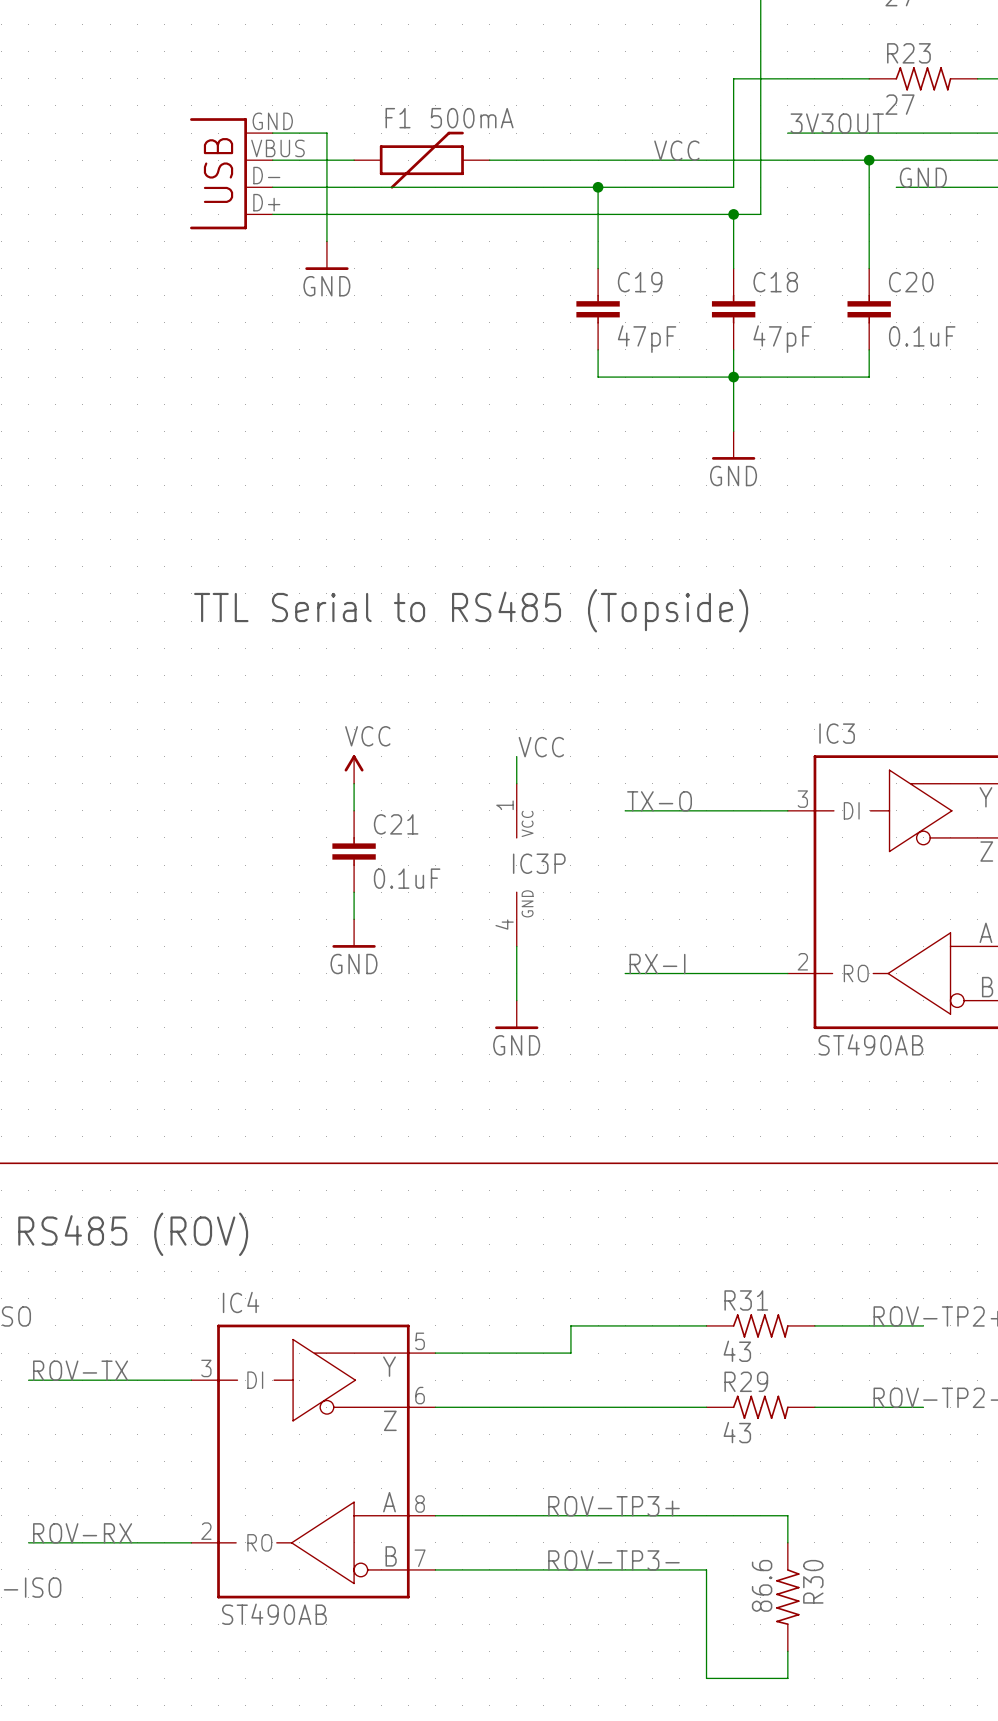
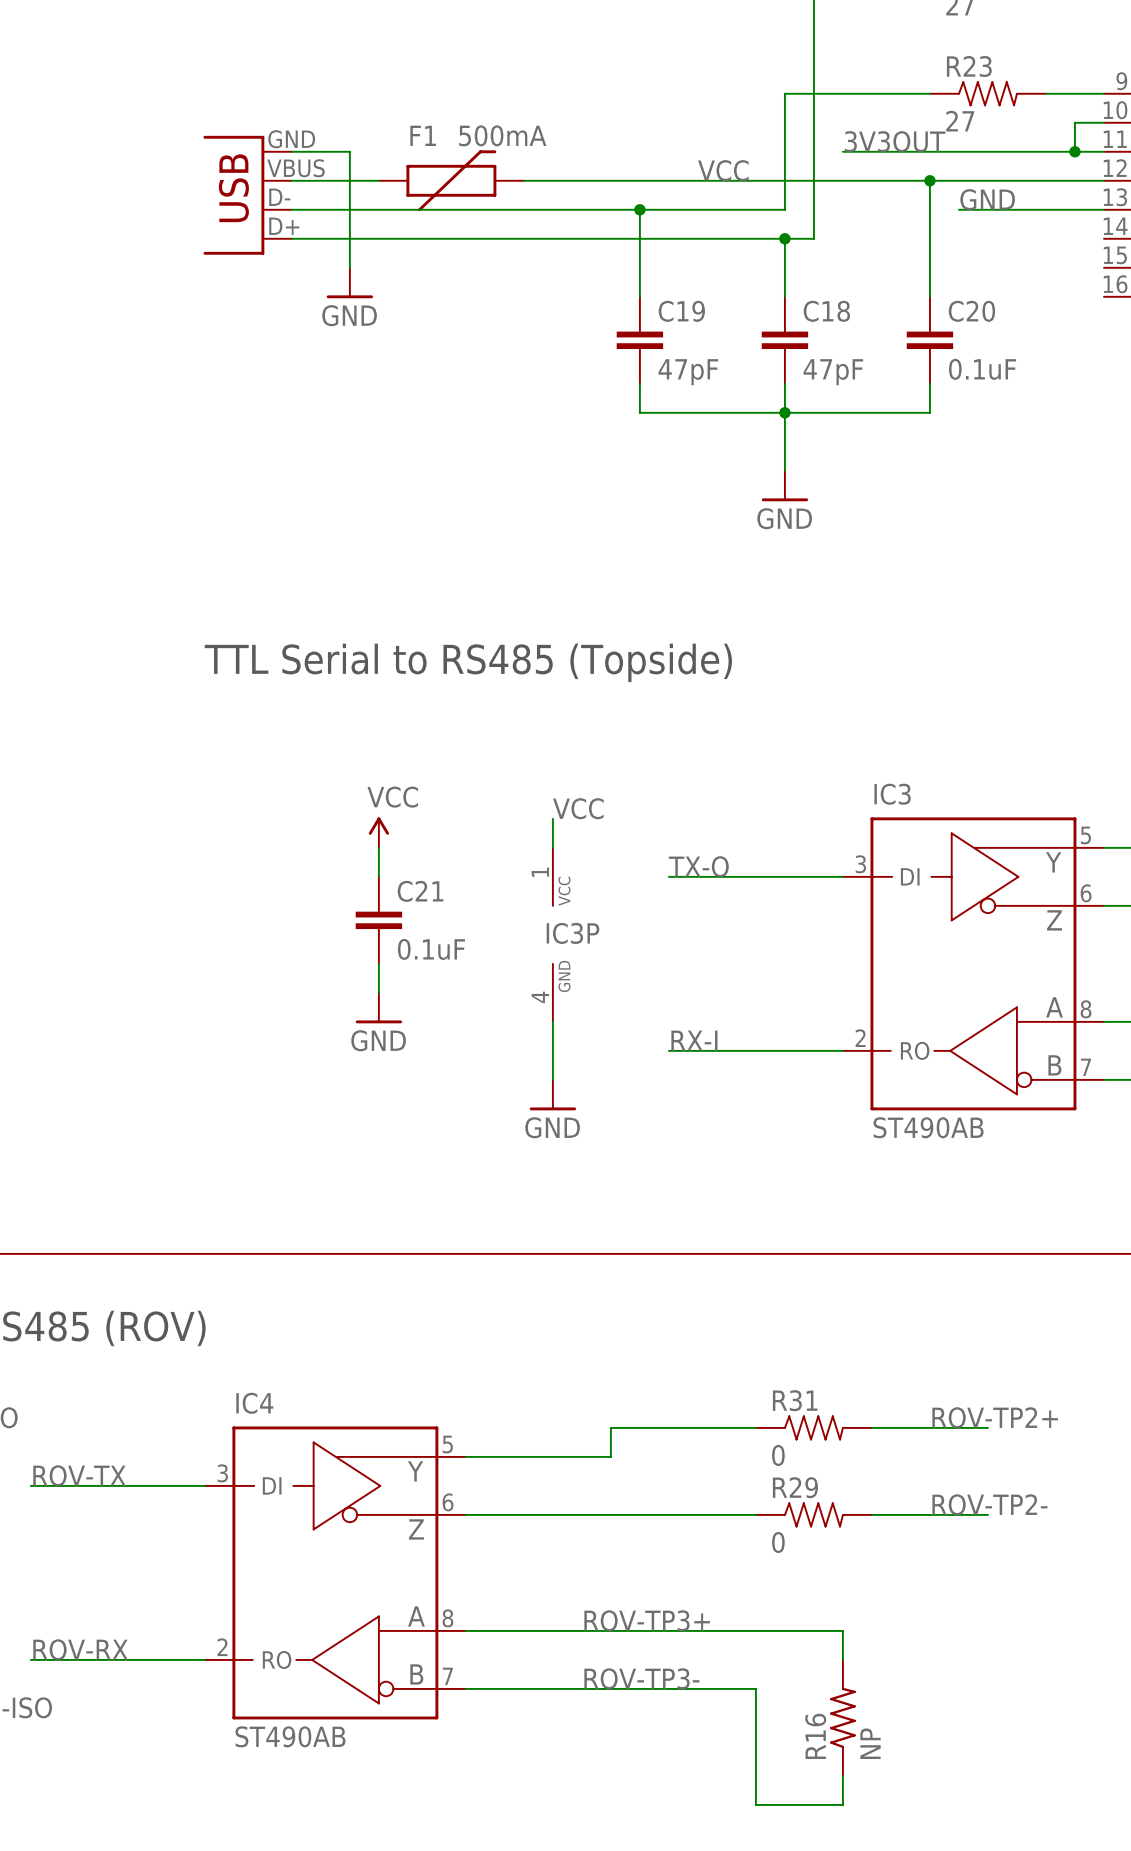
R31 value: 43 (737, 1351) -> 0 (778, 1455)
R29 value: 43 (737, 1432) -> 0 (778, 1542)
R30: 86.6 (787, 1597) -> none
R16: none -> NP (842, 1717)

